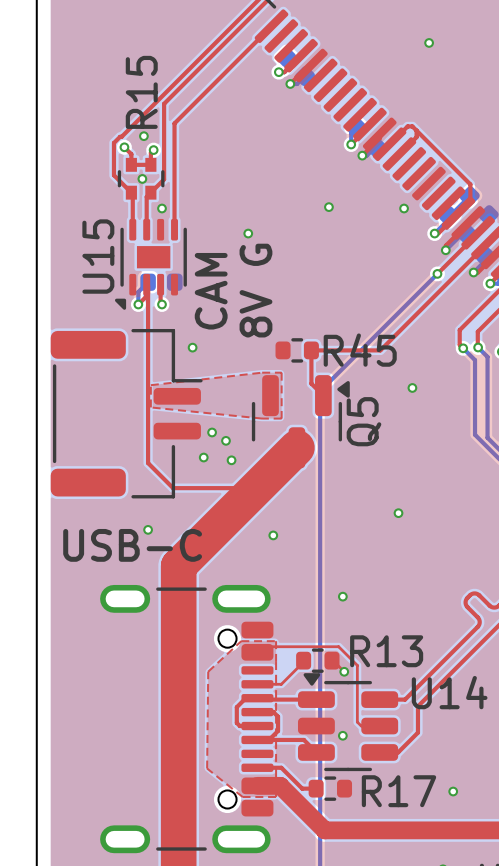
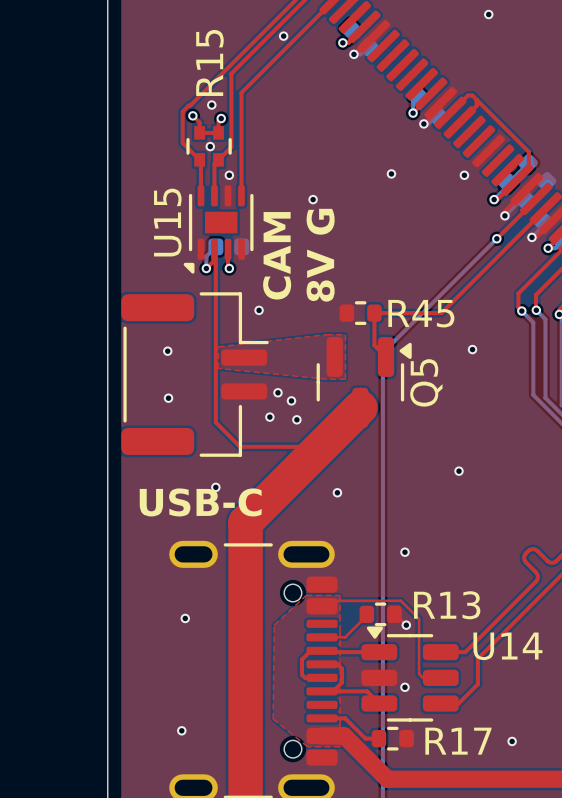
via: none -> (283, 36)
via: none -> (167, 351)
via: none -> (168, 398)
via: none -> (185, 618)
via: none -> (181, 730)

